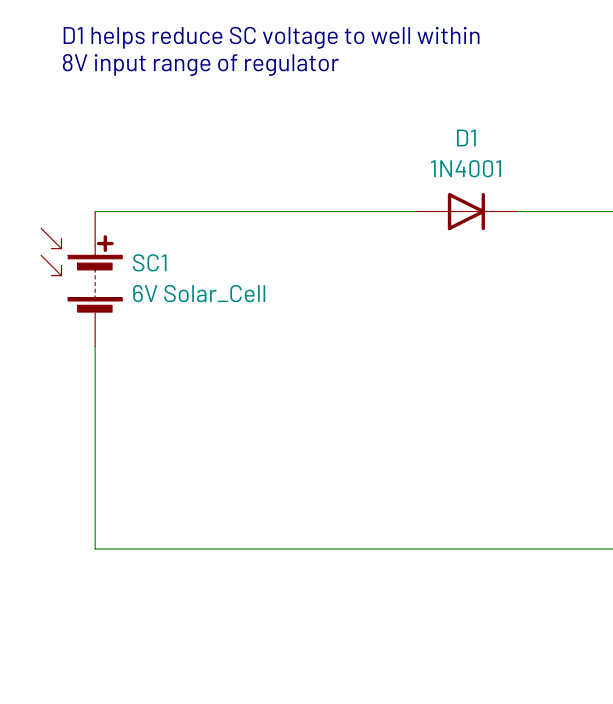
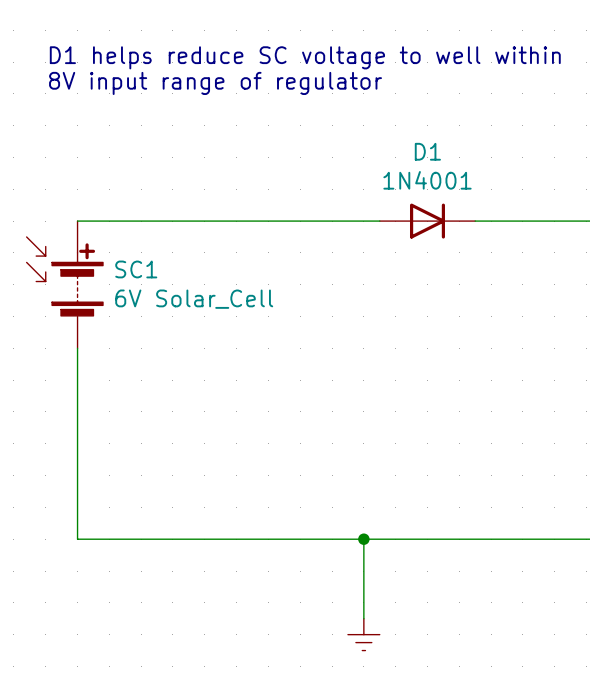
wire: none -> (363, 539) (363, 618)
junction: none -> (363, 539)
power symbol: none -> (363, 634)

